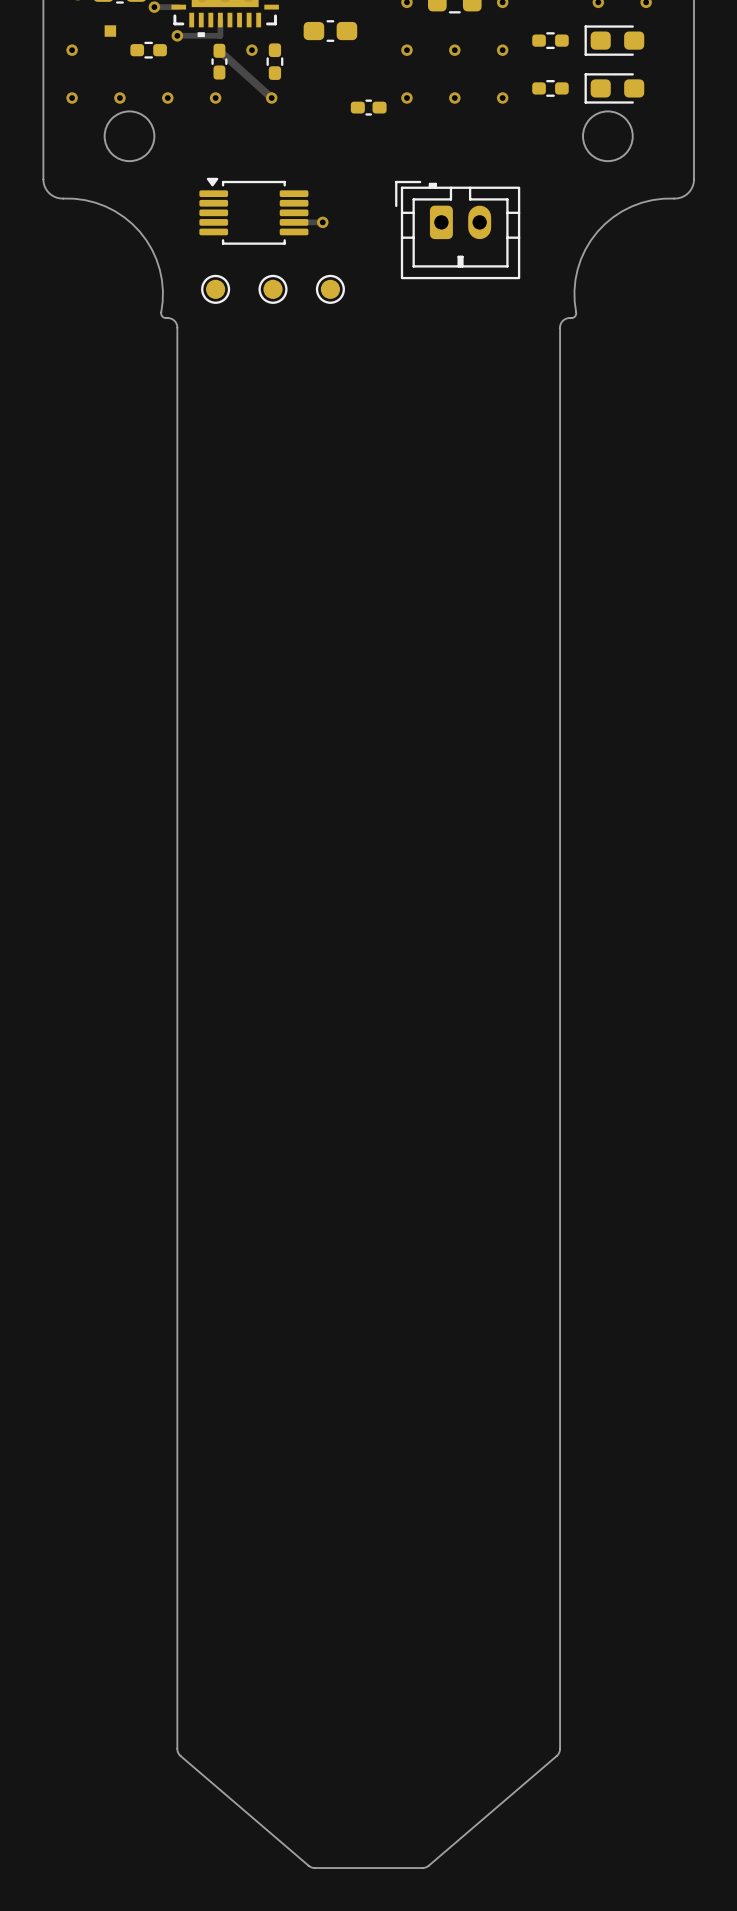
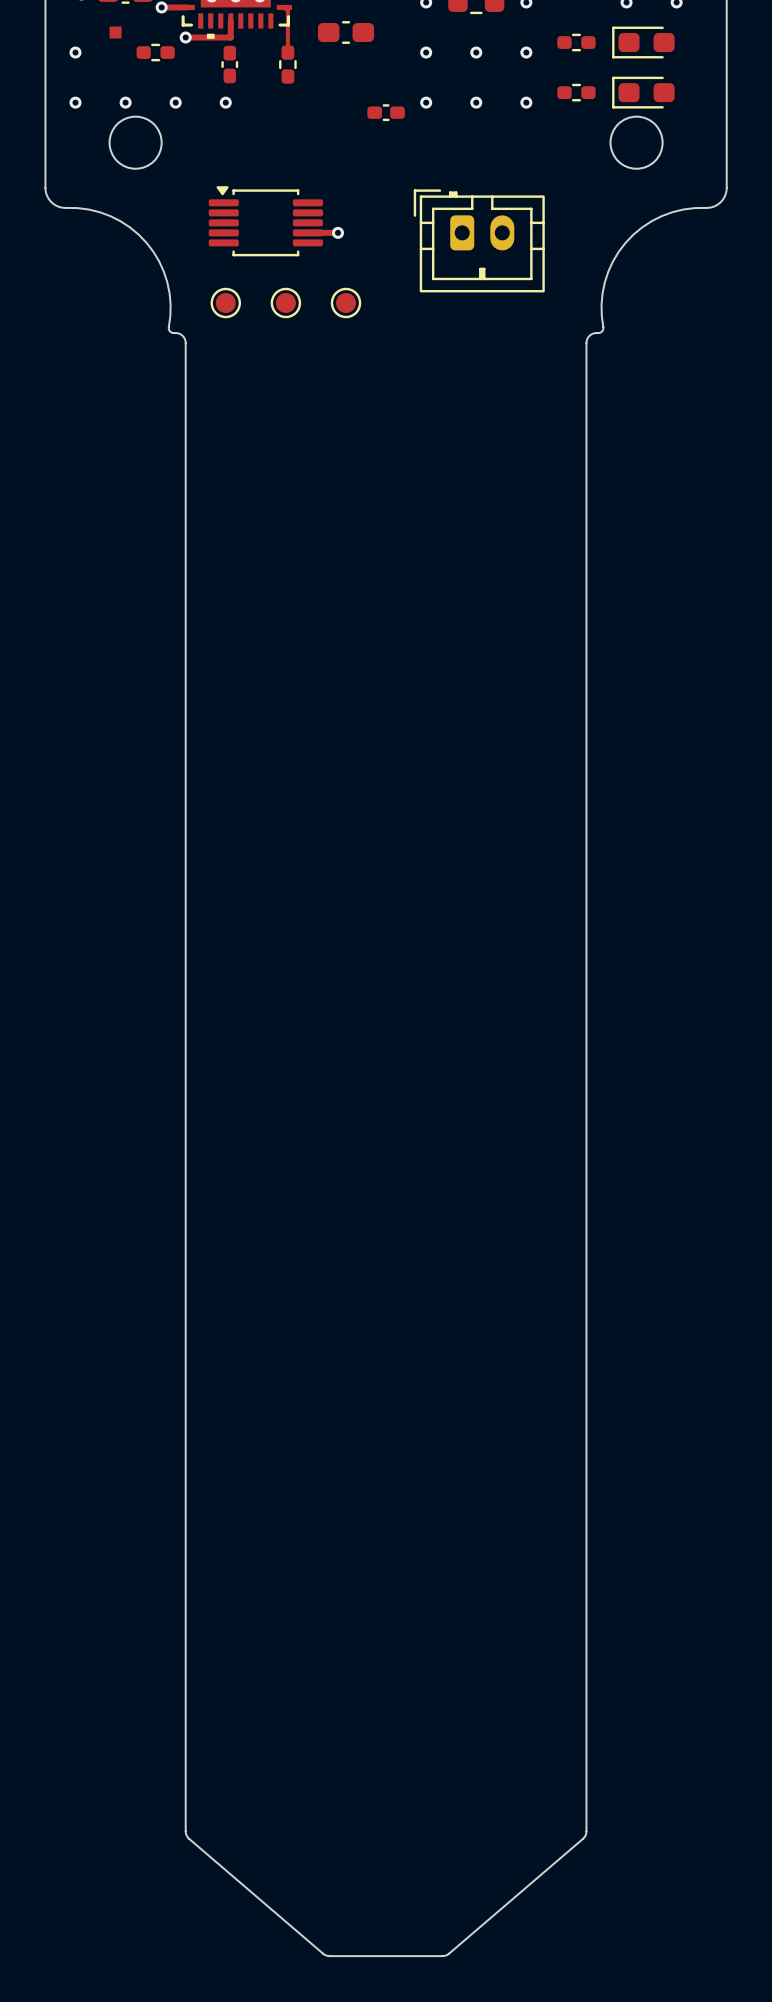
track: none -> (284, 7) (287, 10) (287, 52)
track: (219, 50) (271, 98) -> none
via: (251, 50) -> none
via: (271, 98) -> none

